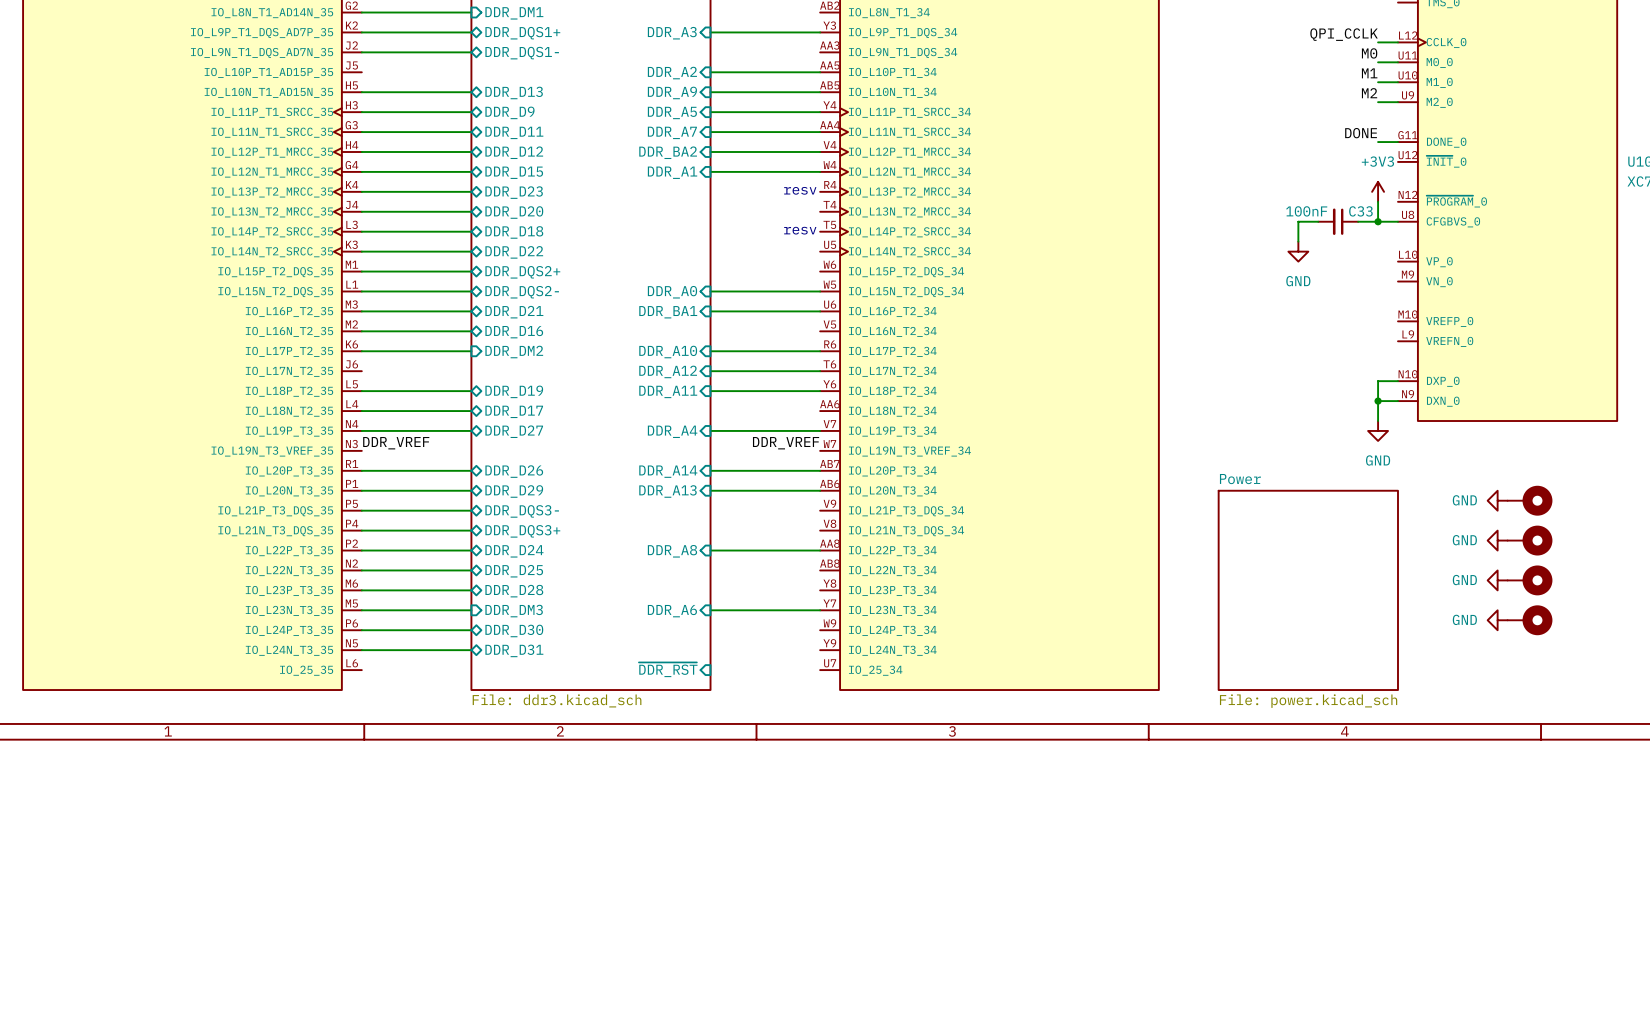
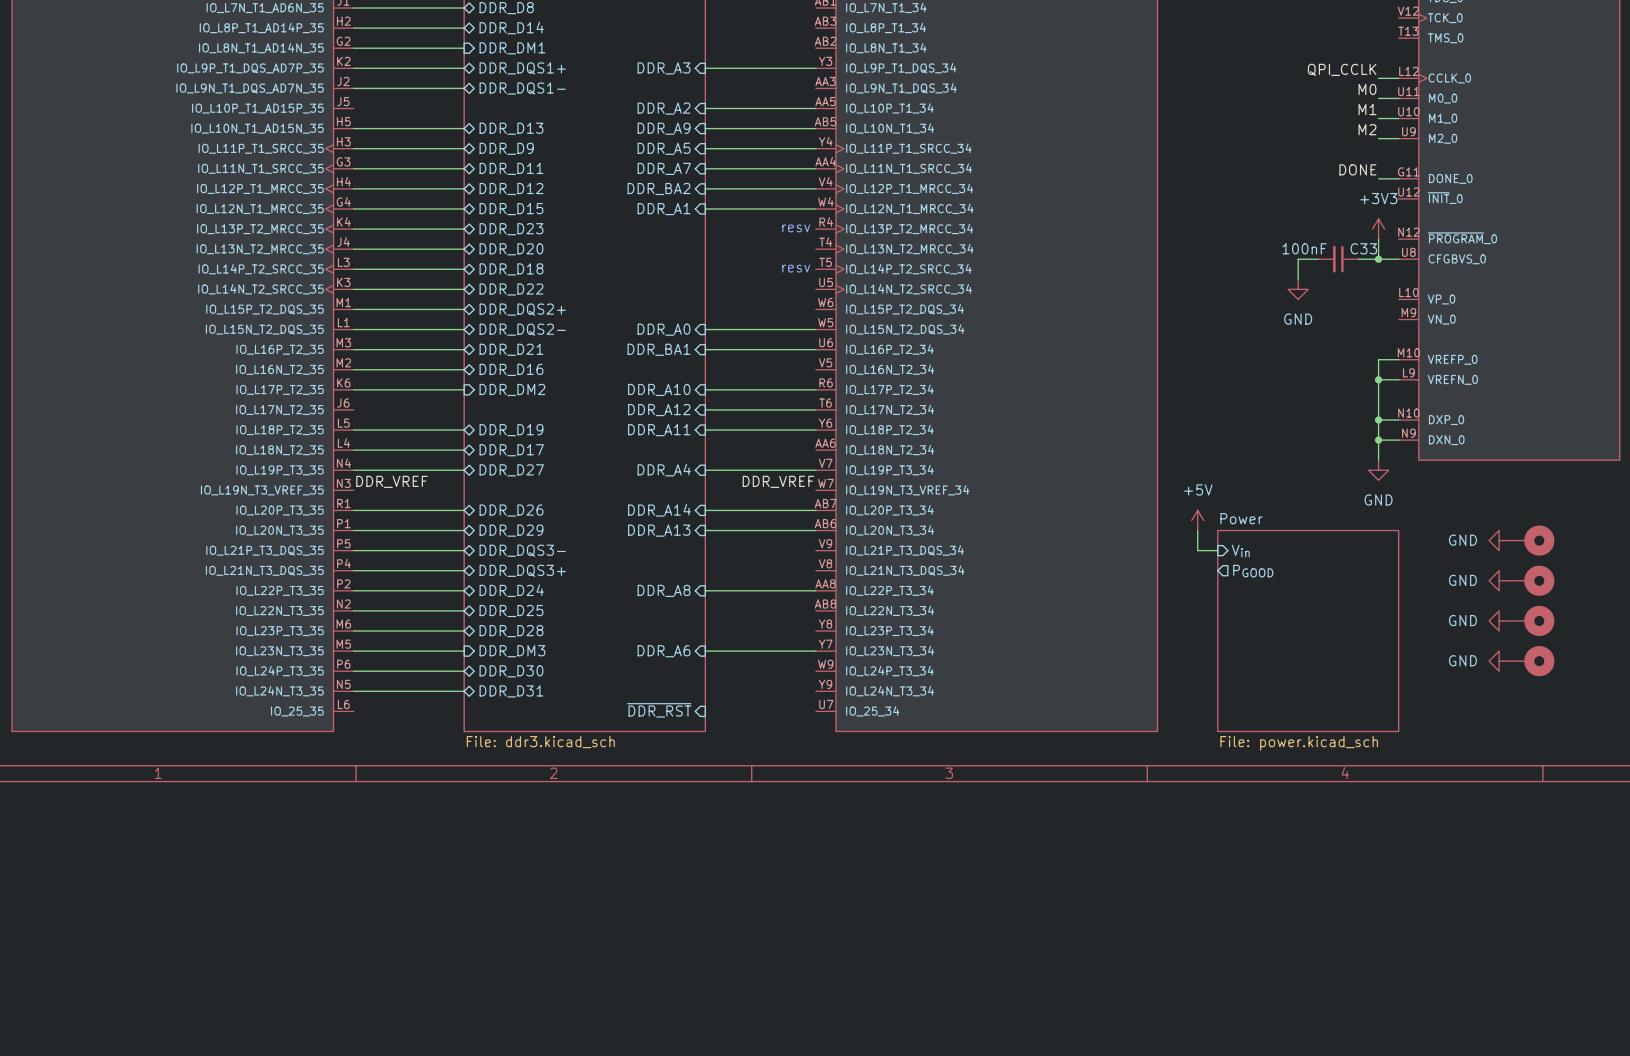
wire: none -> (1398, 359) (1378, 359) (1378, 419)
wire: none -> (1378, 379) (1398, 379)
junction: none -> (1378, 379)
junction: none -> (1378, 419)
power symbol: none -> +5V (1197, 520)
wire: none -> (1197, 530) (1197, 550) (1217, 550)
sheet pin: none -> Vin (1240, 551)
sheet pin: none -> PGOOD (1253, 571)

